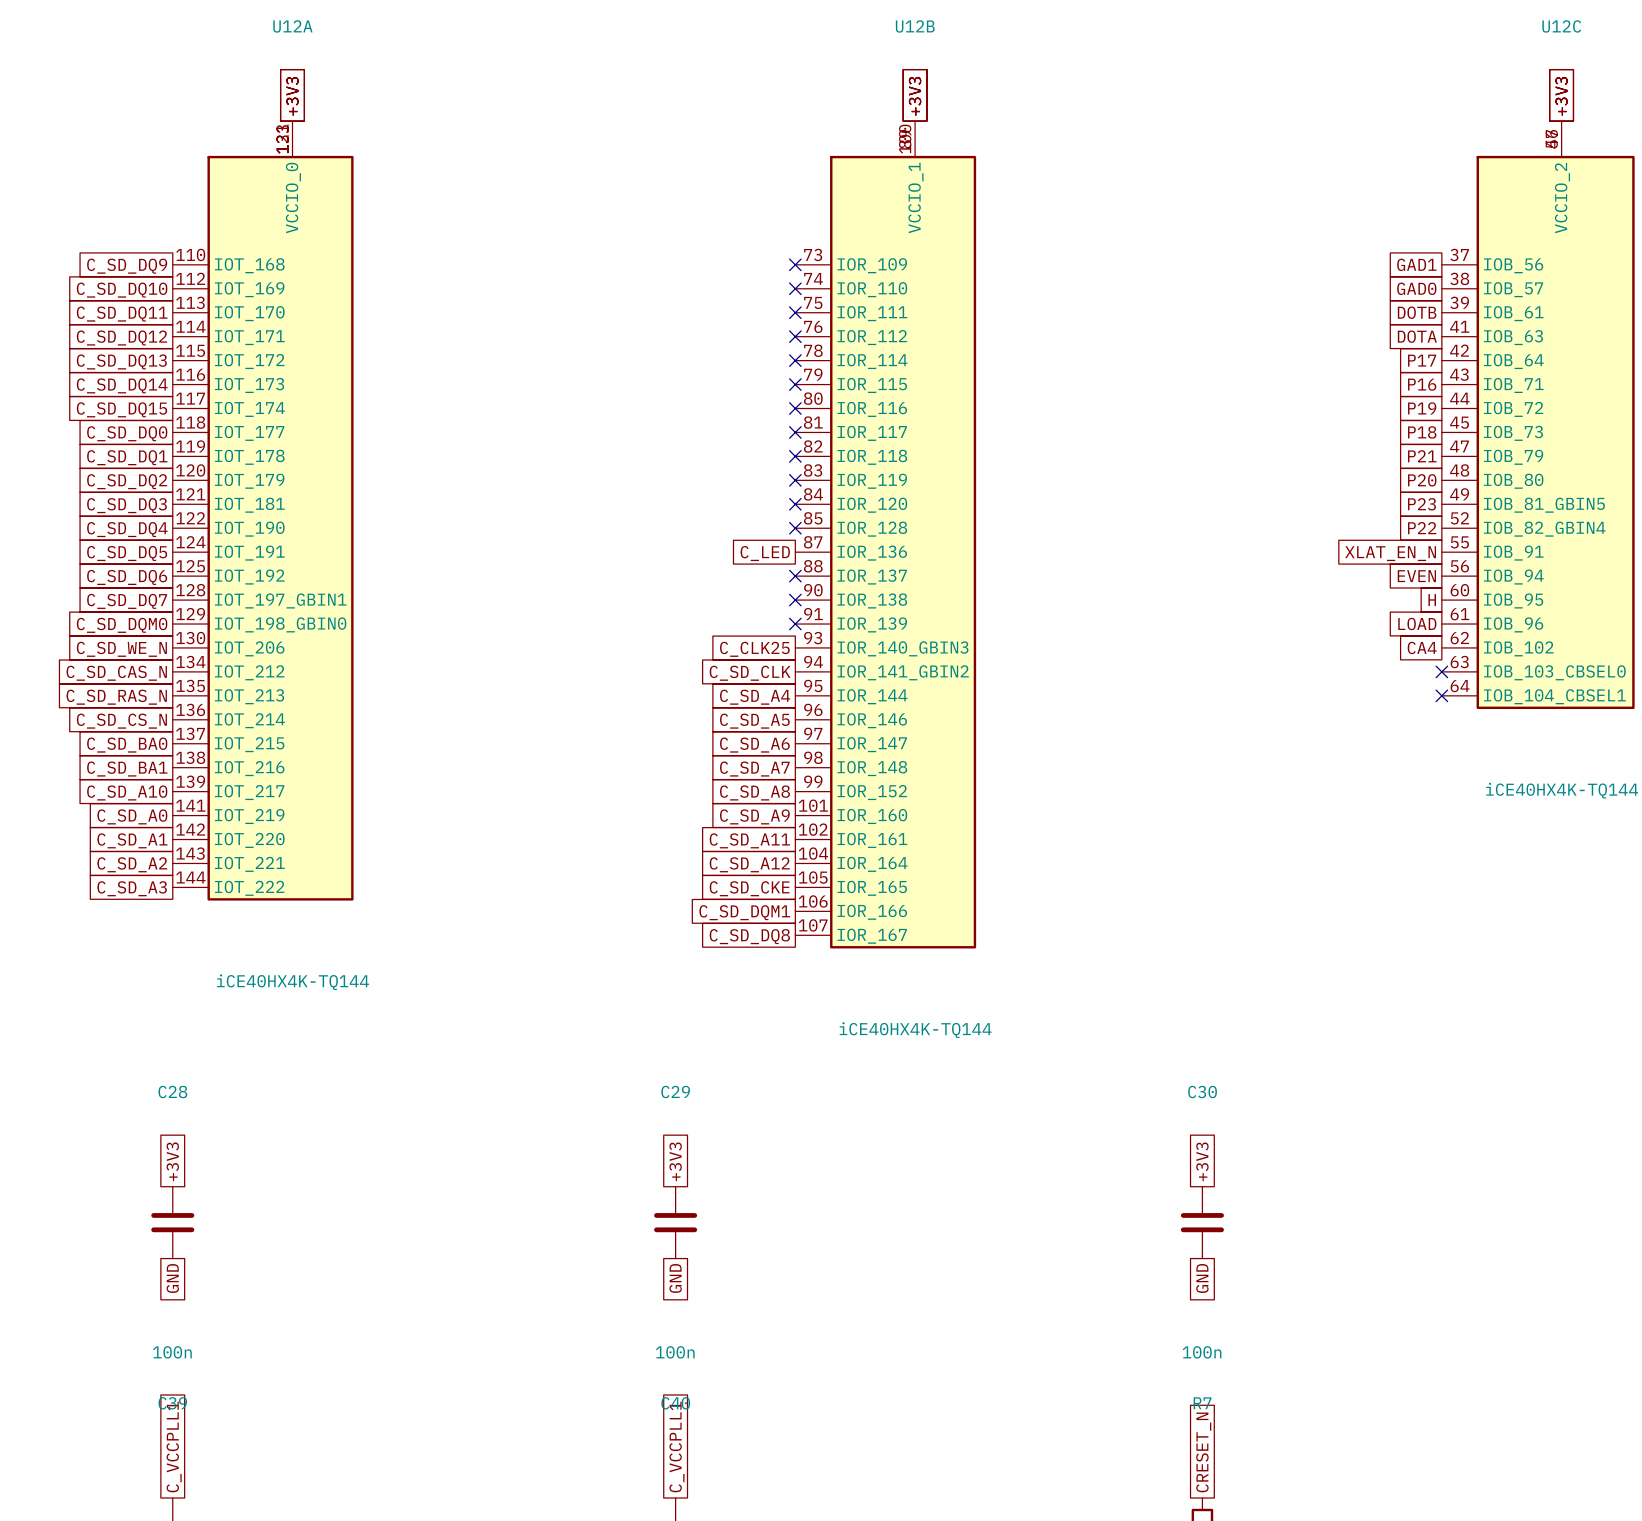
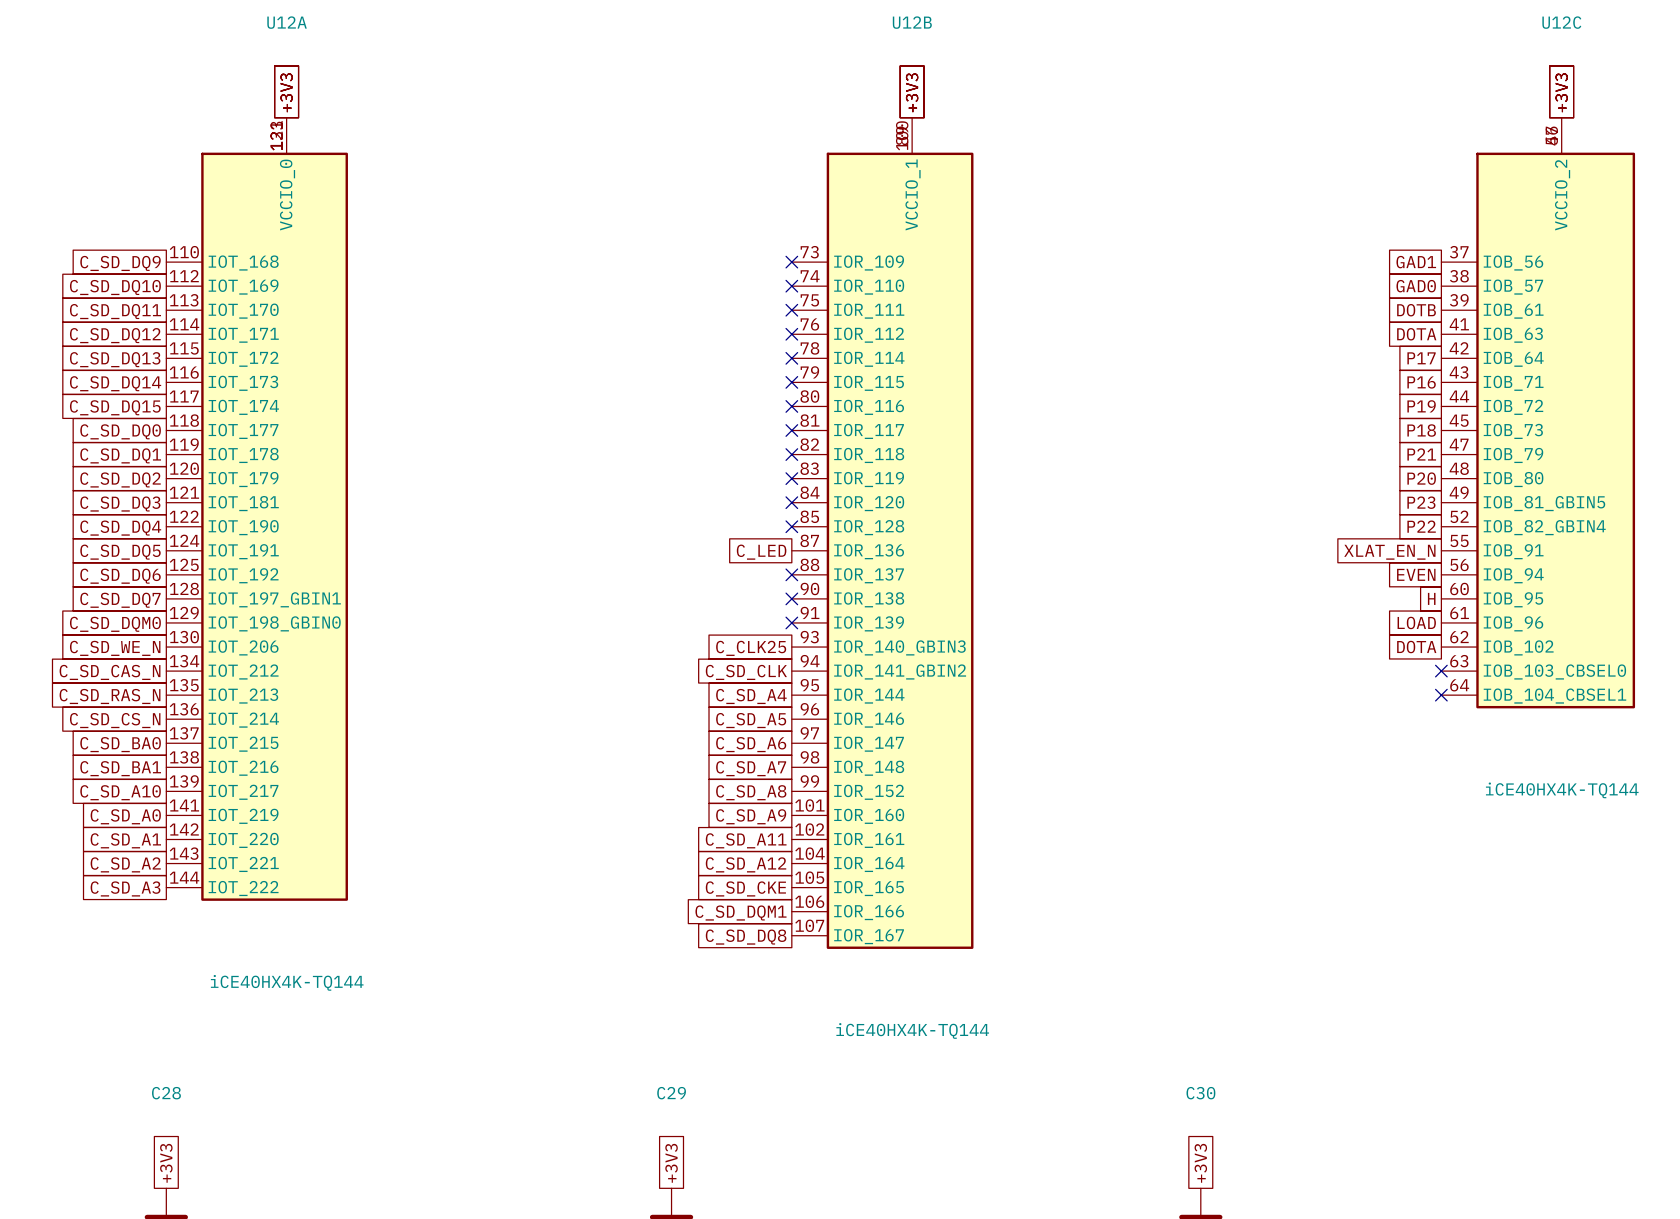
global label: CA4 (1422, 647) -> DOTA (1416, 647)

